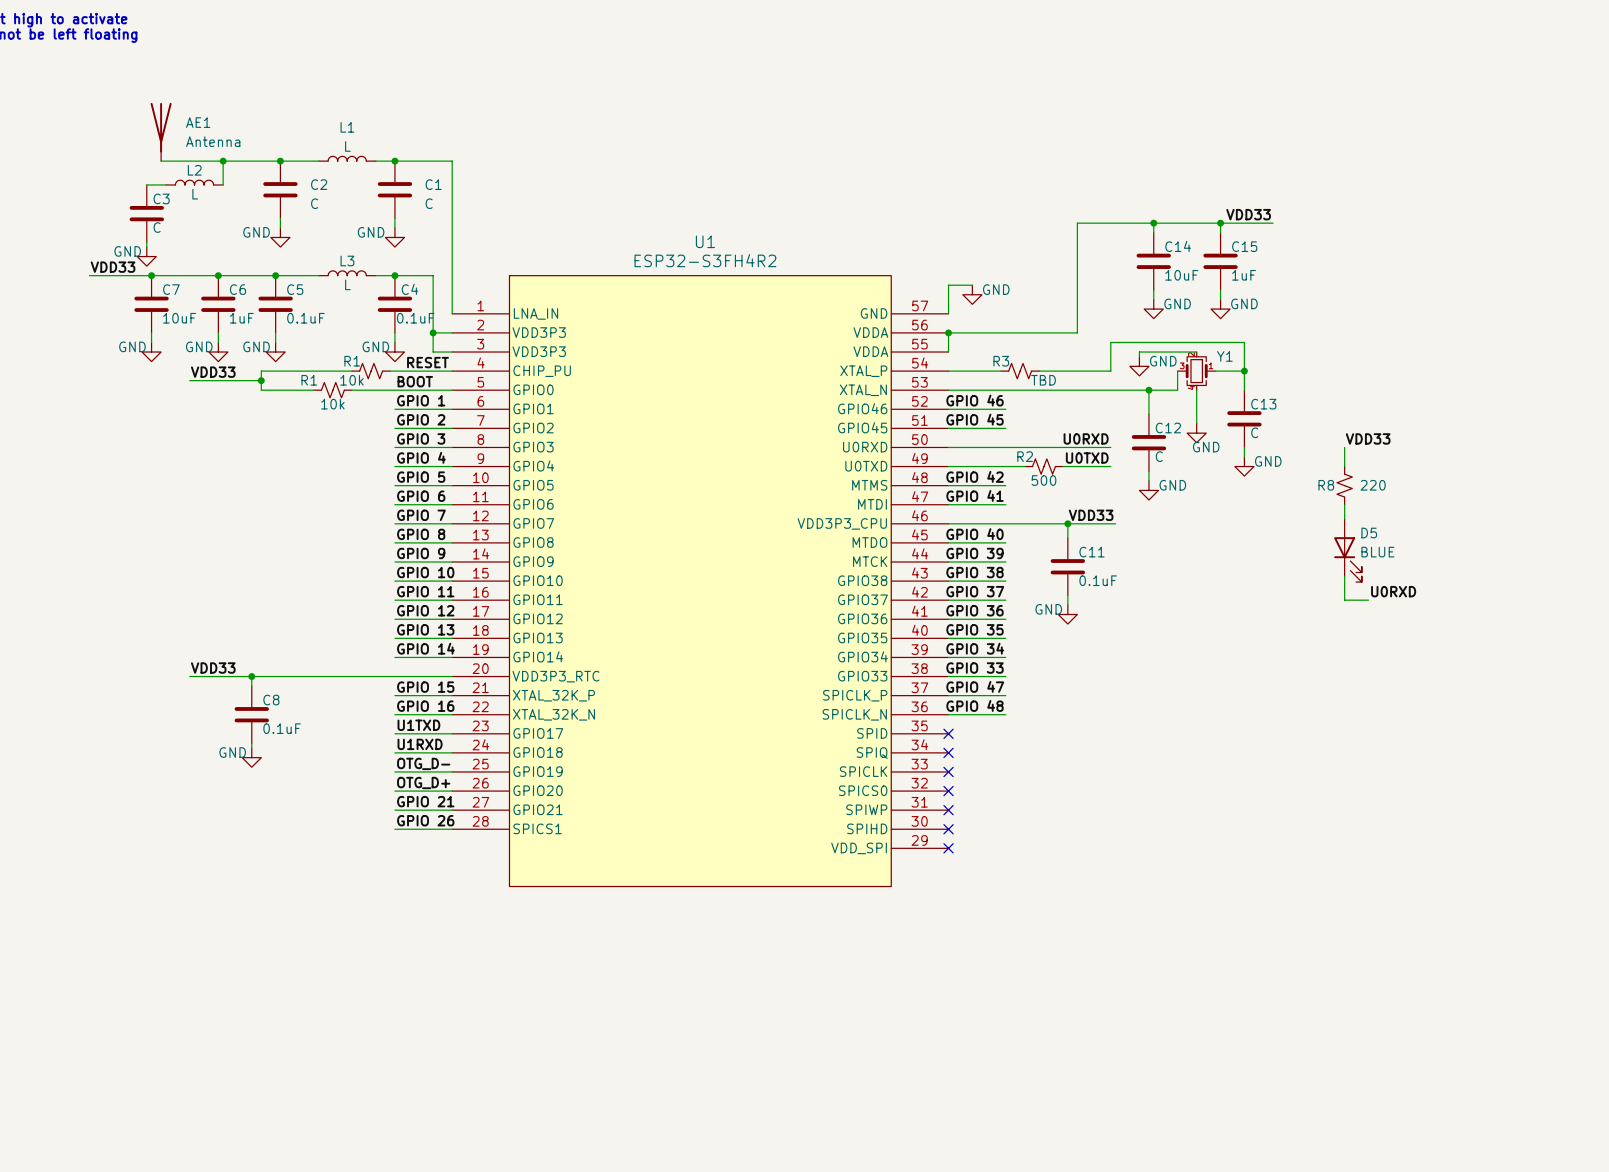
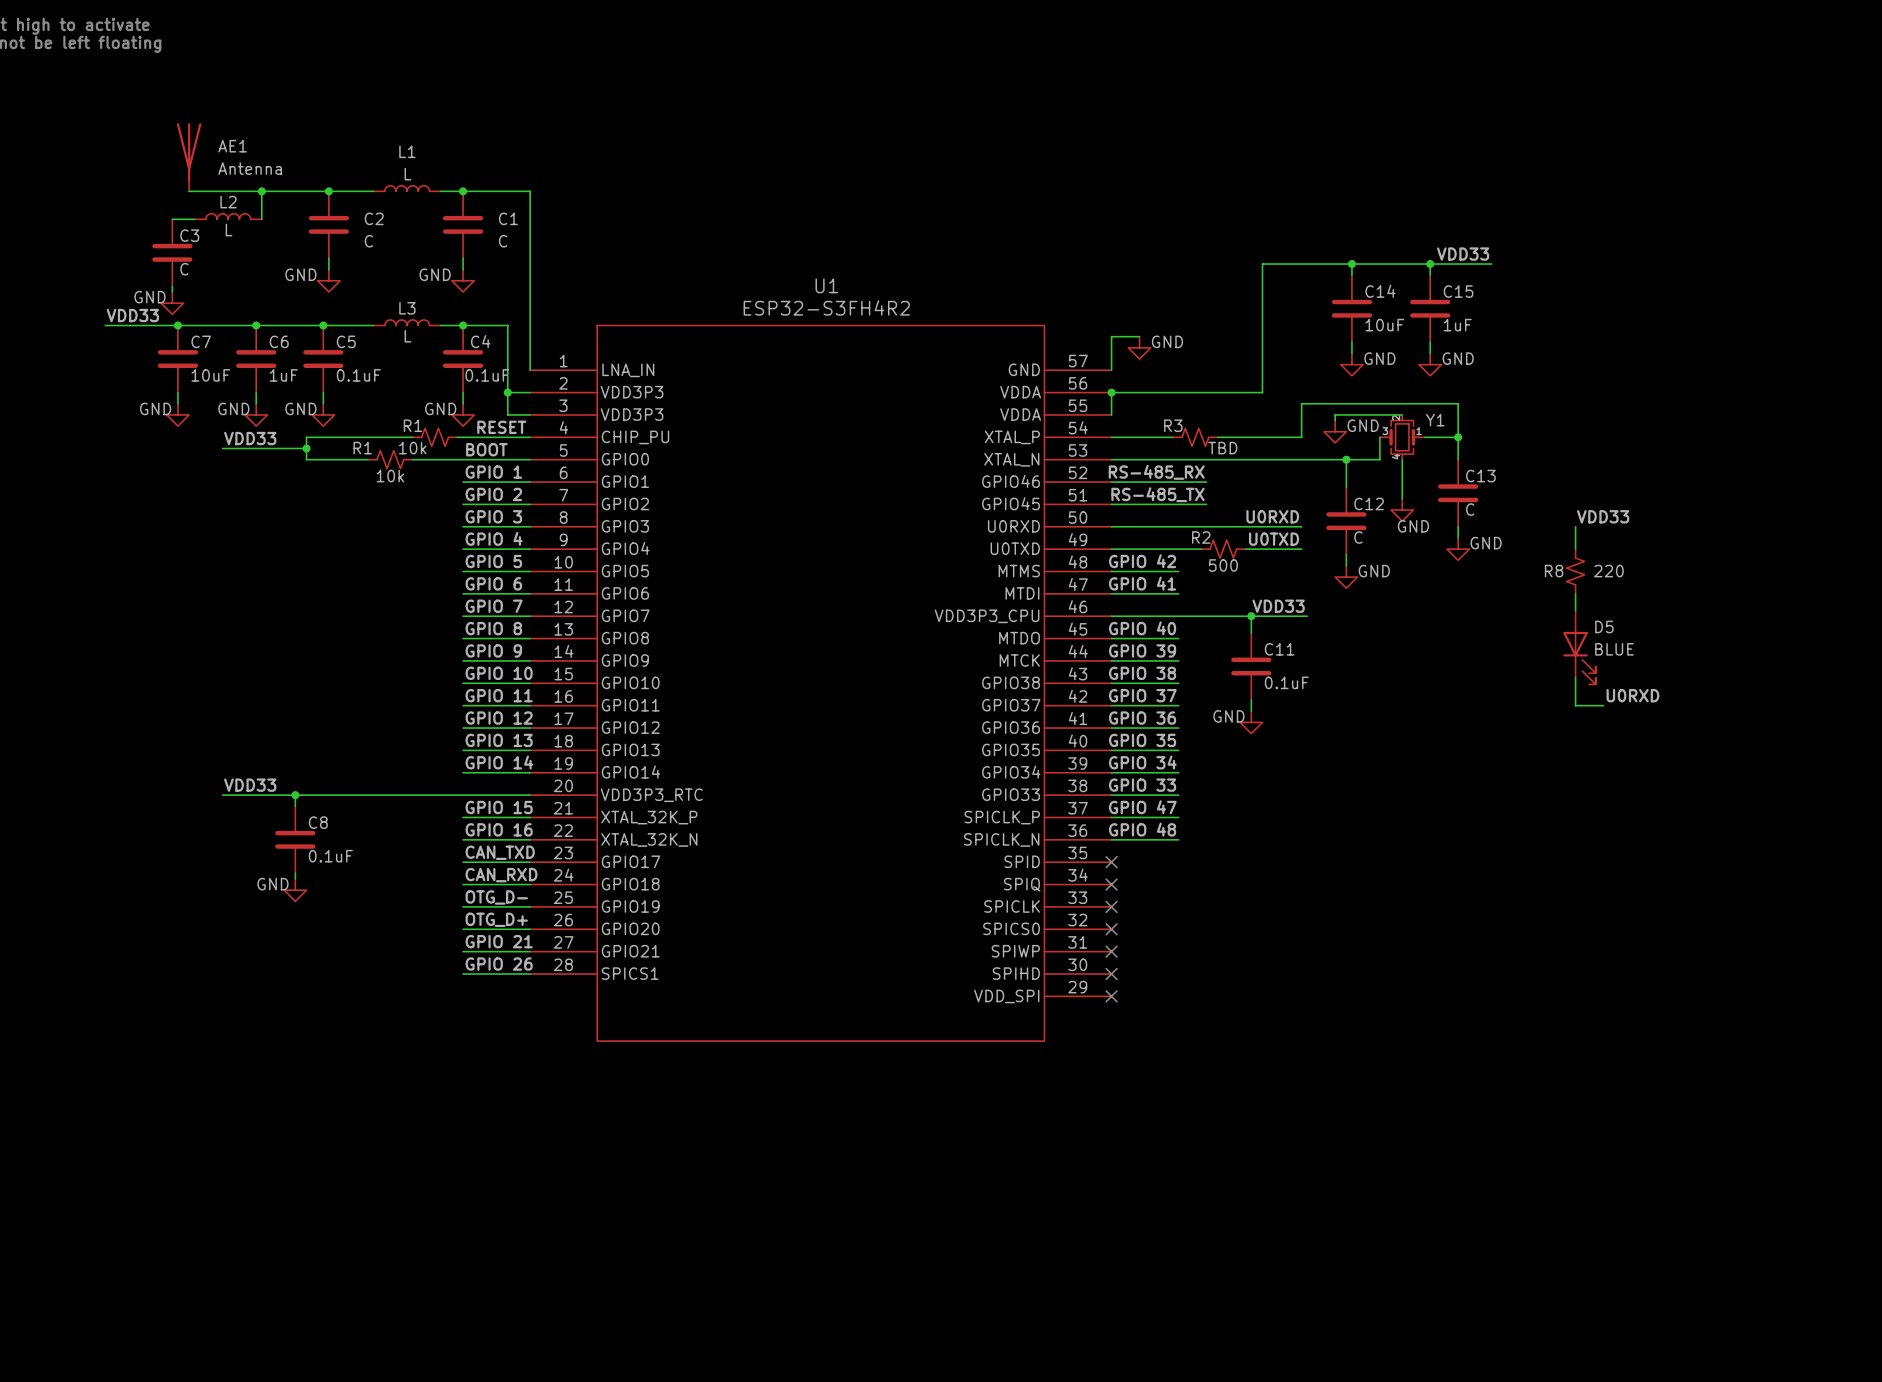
label: GPIO 46 (975, 400) -> none
label: none -> RS-485_RX (1156, 472)
wire: none -> (1178, 482) (1206, 482)
label: GPIO 45 (975, 419) -> none
label: none -> RS-485_TX (1158, 494)
wire: none -> (1178, 504) (1206, 504)
label: U1TXD (418, 725) -> CAN_TXD (500, 852)
label: U1RXD (420, 744) -> CAN_RXD (501, 875)

